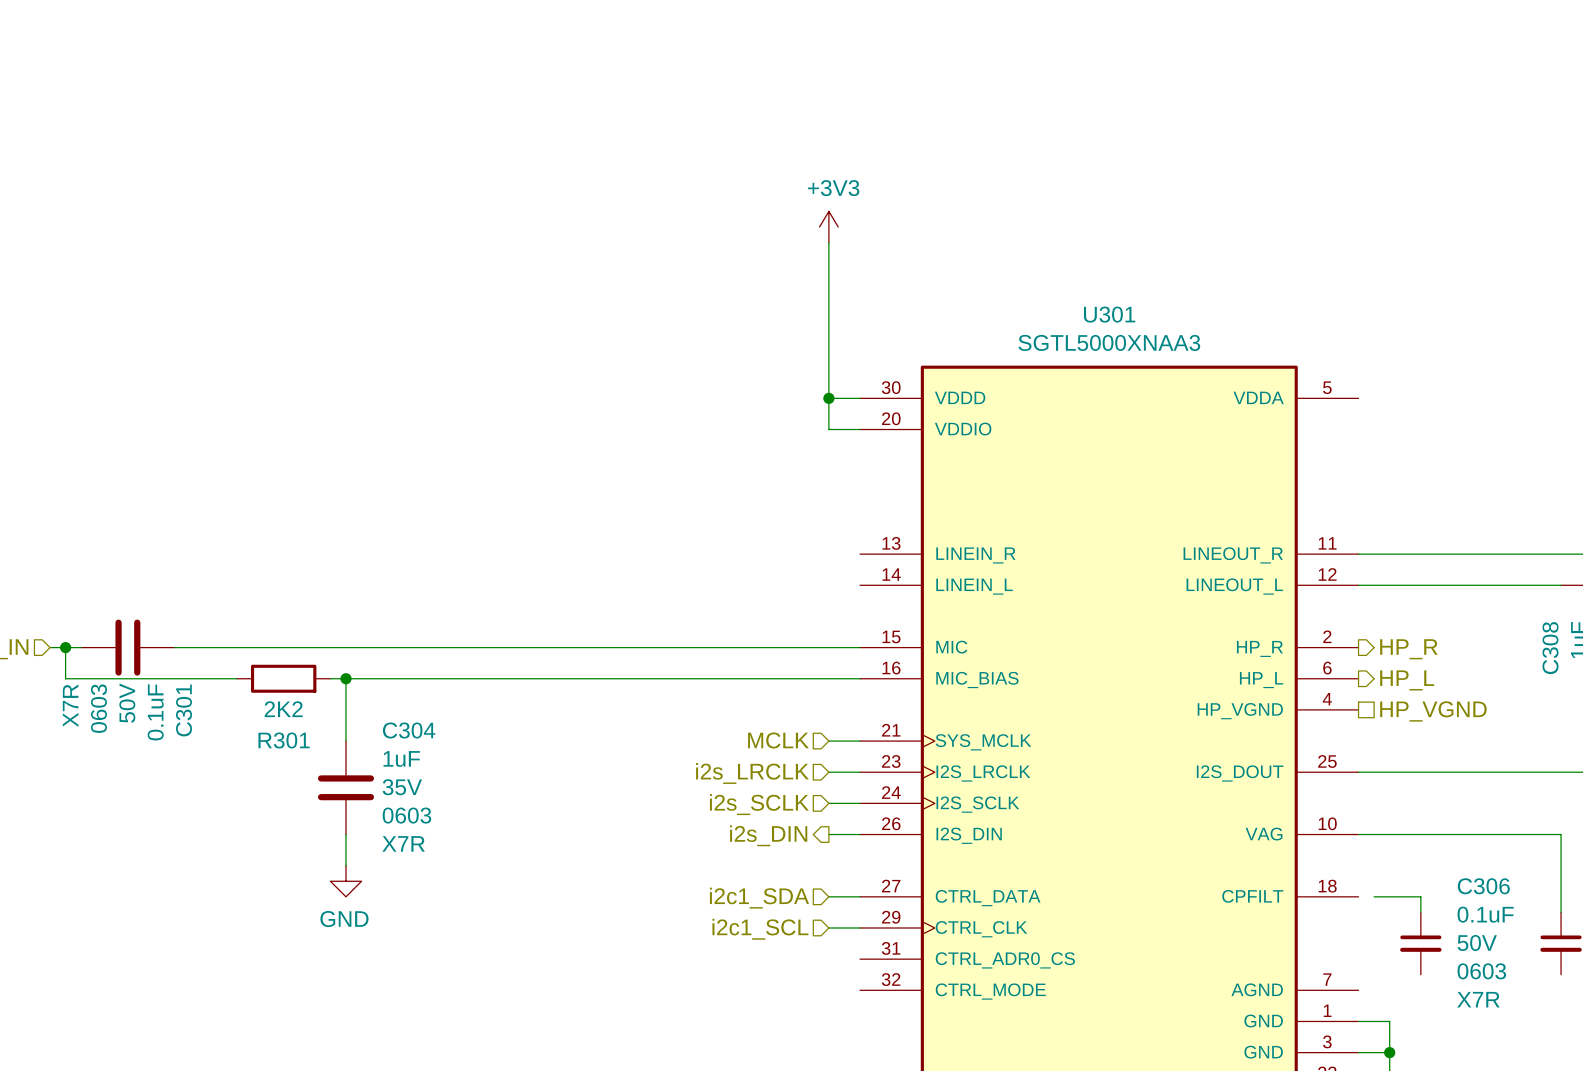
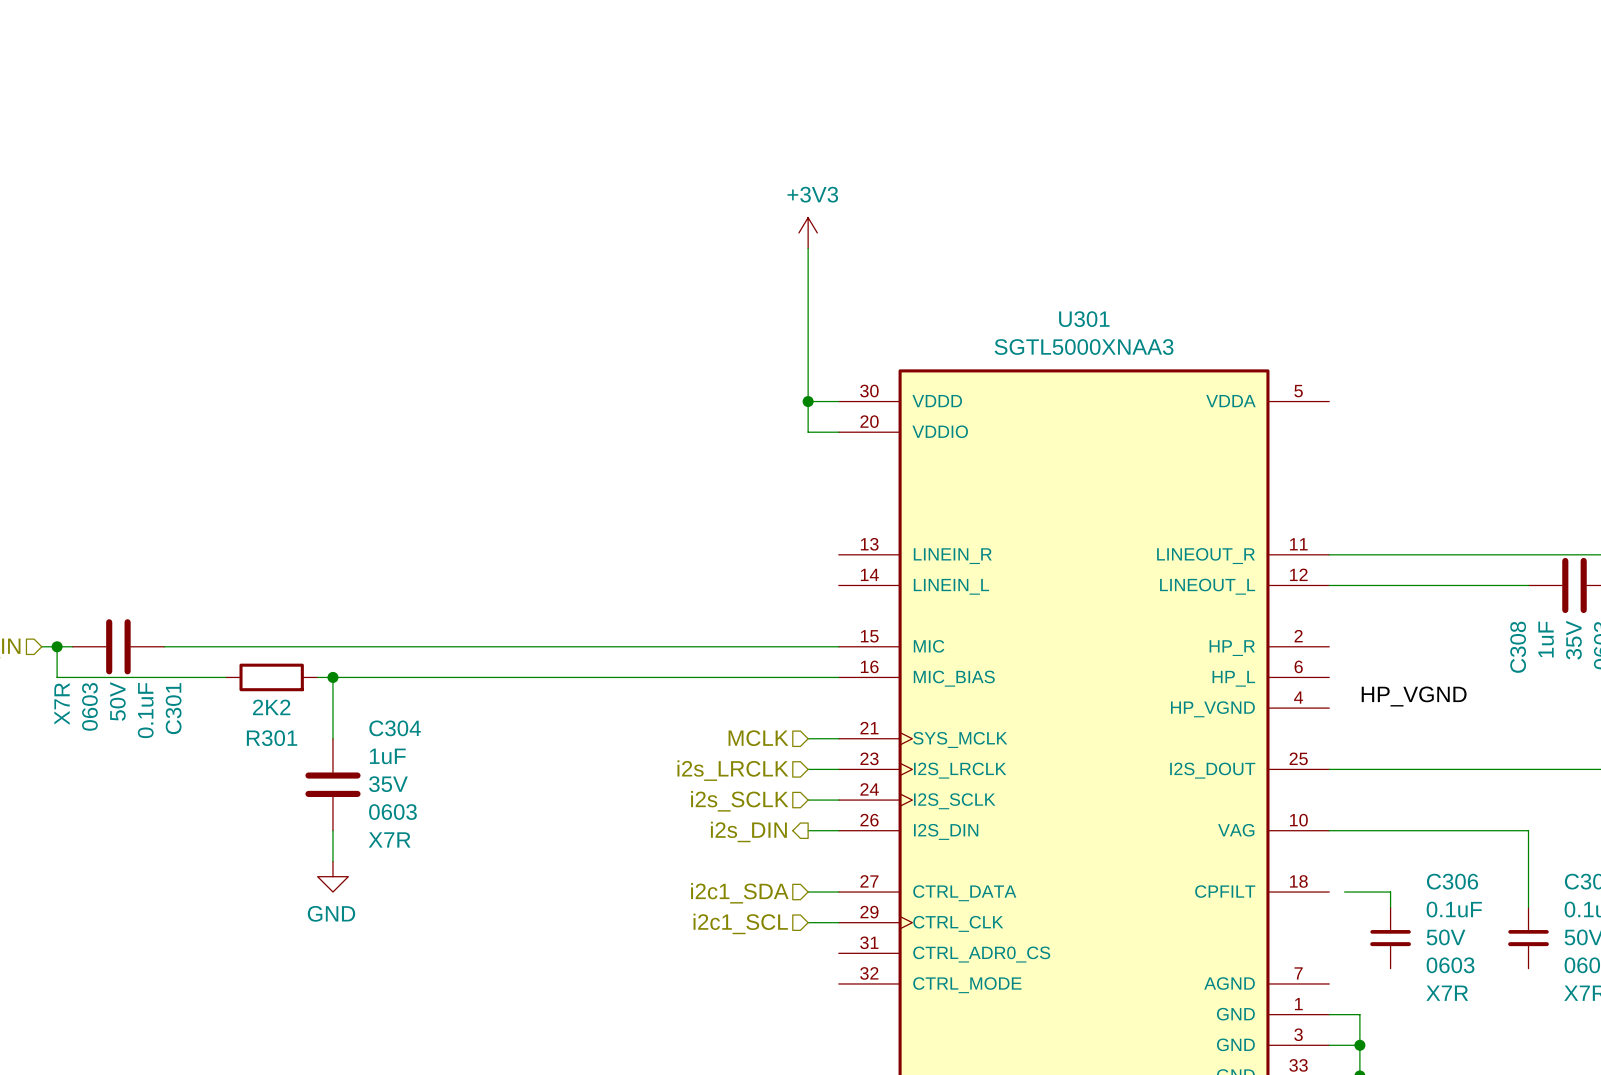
hierarchical label: HP_R (1408, 649) -> none
hierarchical label: HP_L (1407, 680) -> none
label: none -> HP_VGND (1414, 696)
hierarchical label: HP_VGND (1433, 711) -> none

